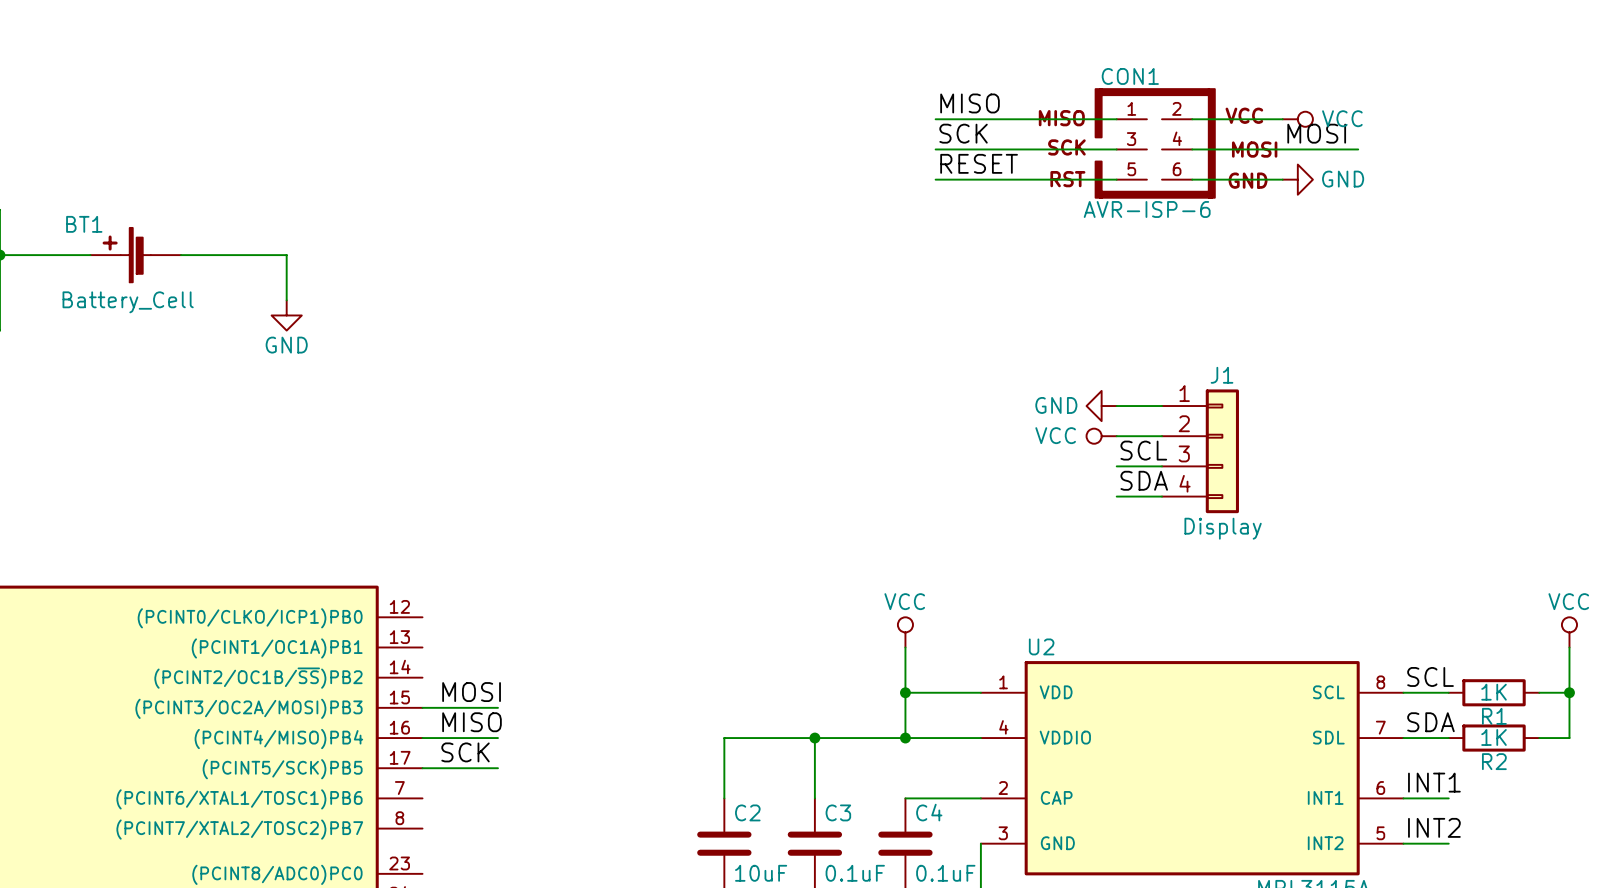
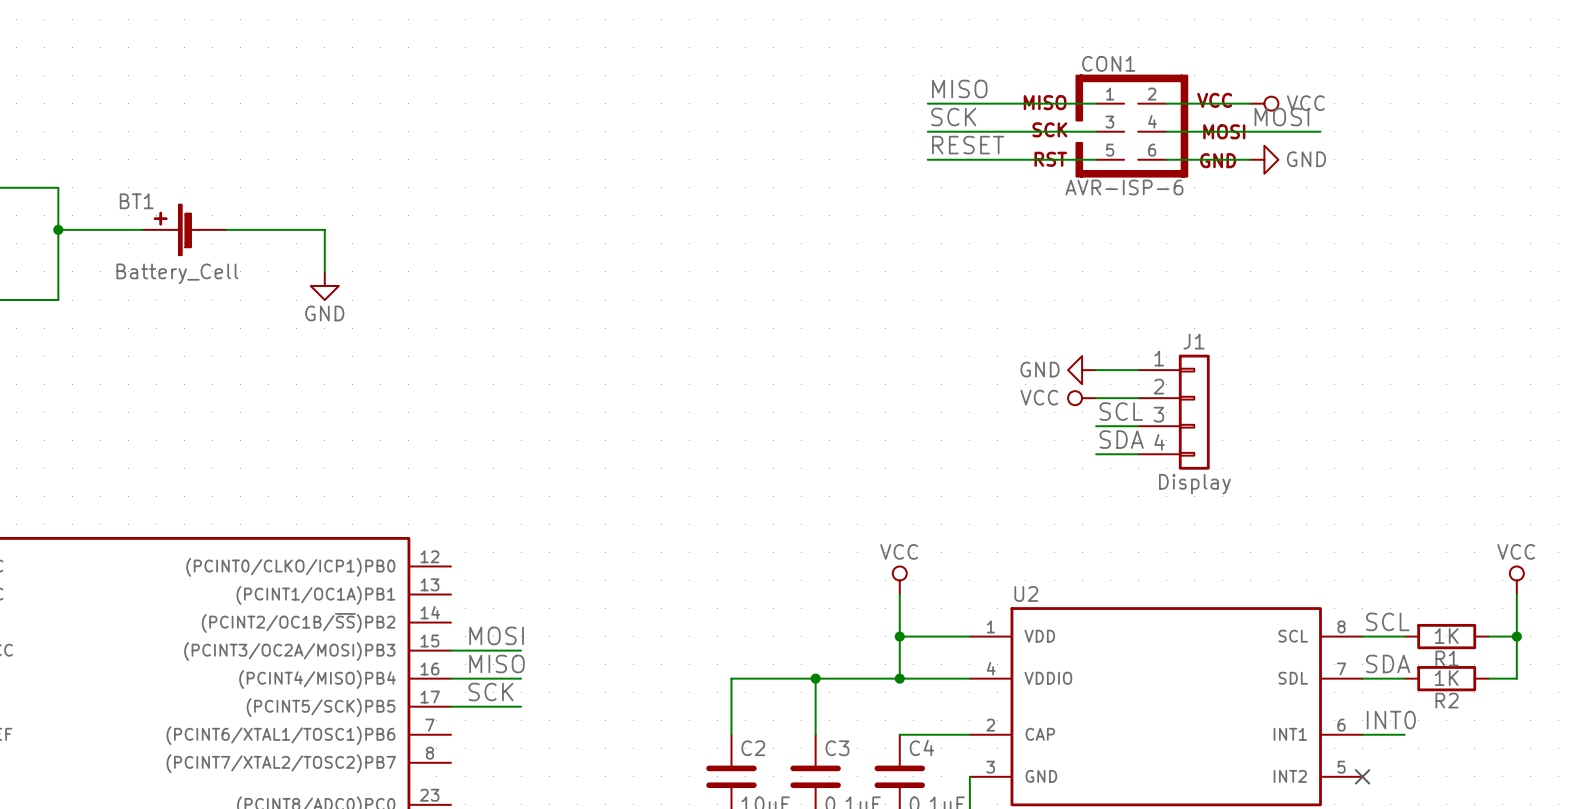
label: INT1 (1434, 782) -> INT0 (1391, 720)
label: INT2 (1434, 827) -> none
wire: (1403, 843) (1448, 843) -> none
no-connect mark: none -> (1362, 776)

